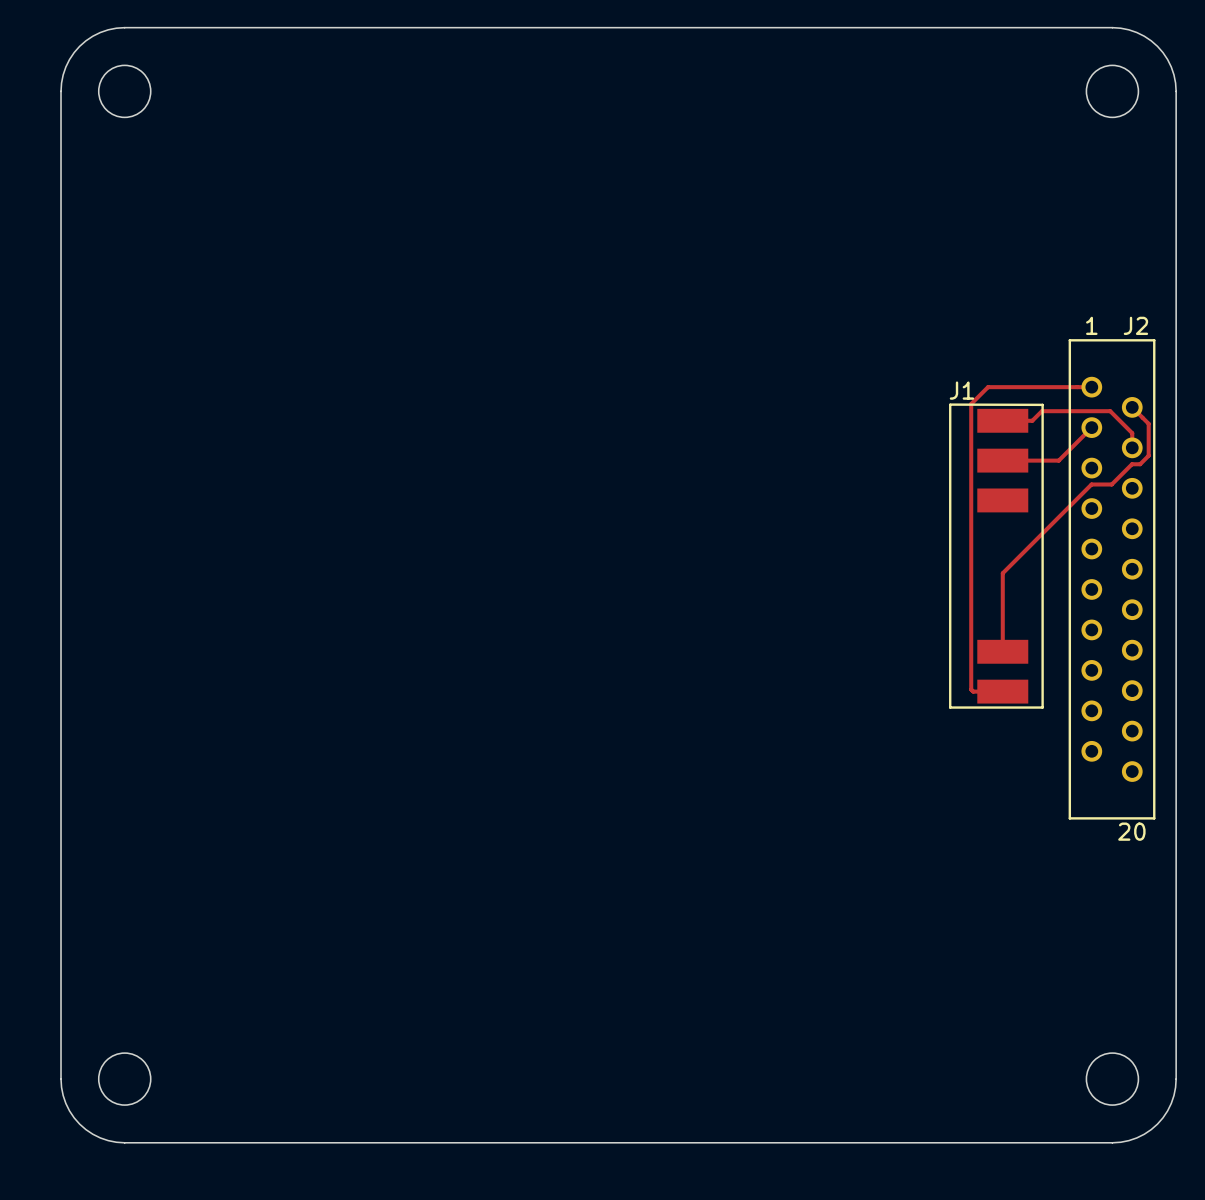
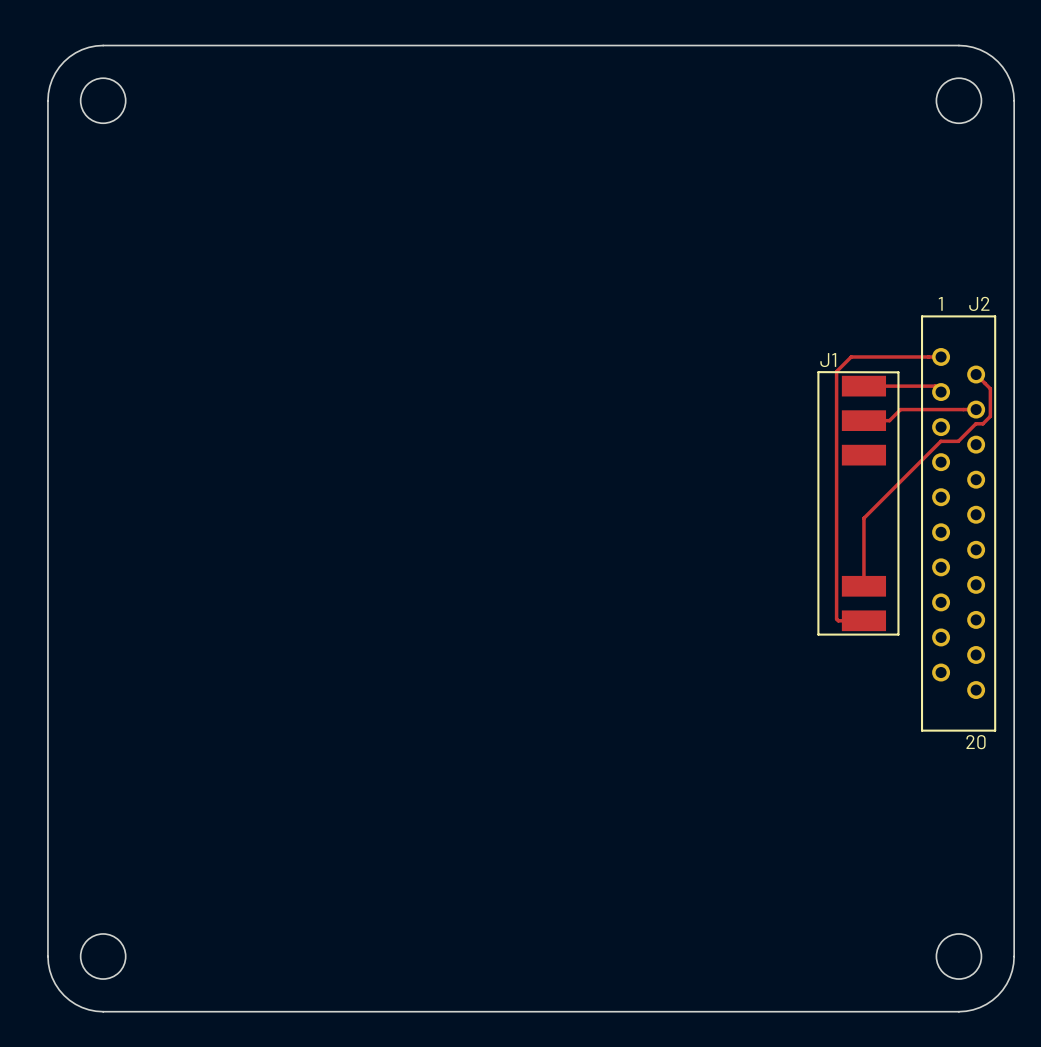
track: (1032, 420) (1041, 411) (1110, 411) (1132, 433) (1132, 447) -> (889, 420) (900, 409) (976, 409)
track: (1091, 427) (1058, 460) (1032, 460) -> (941, 392) (935, 386) (889, 386)

